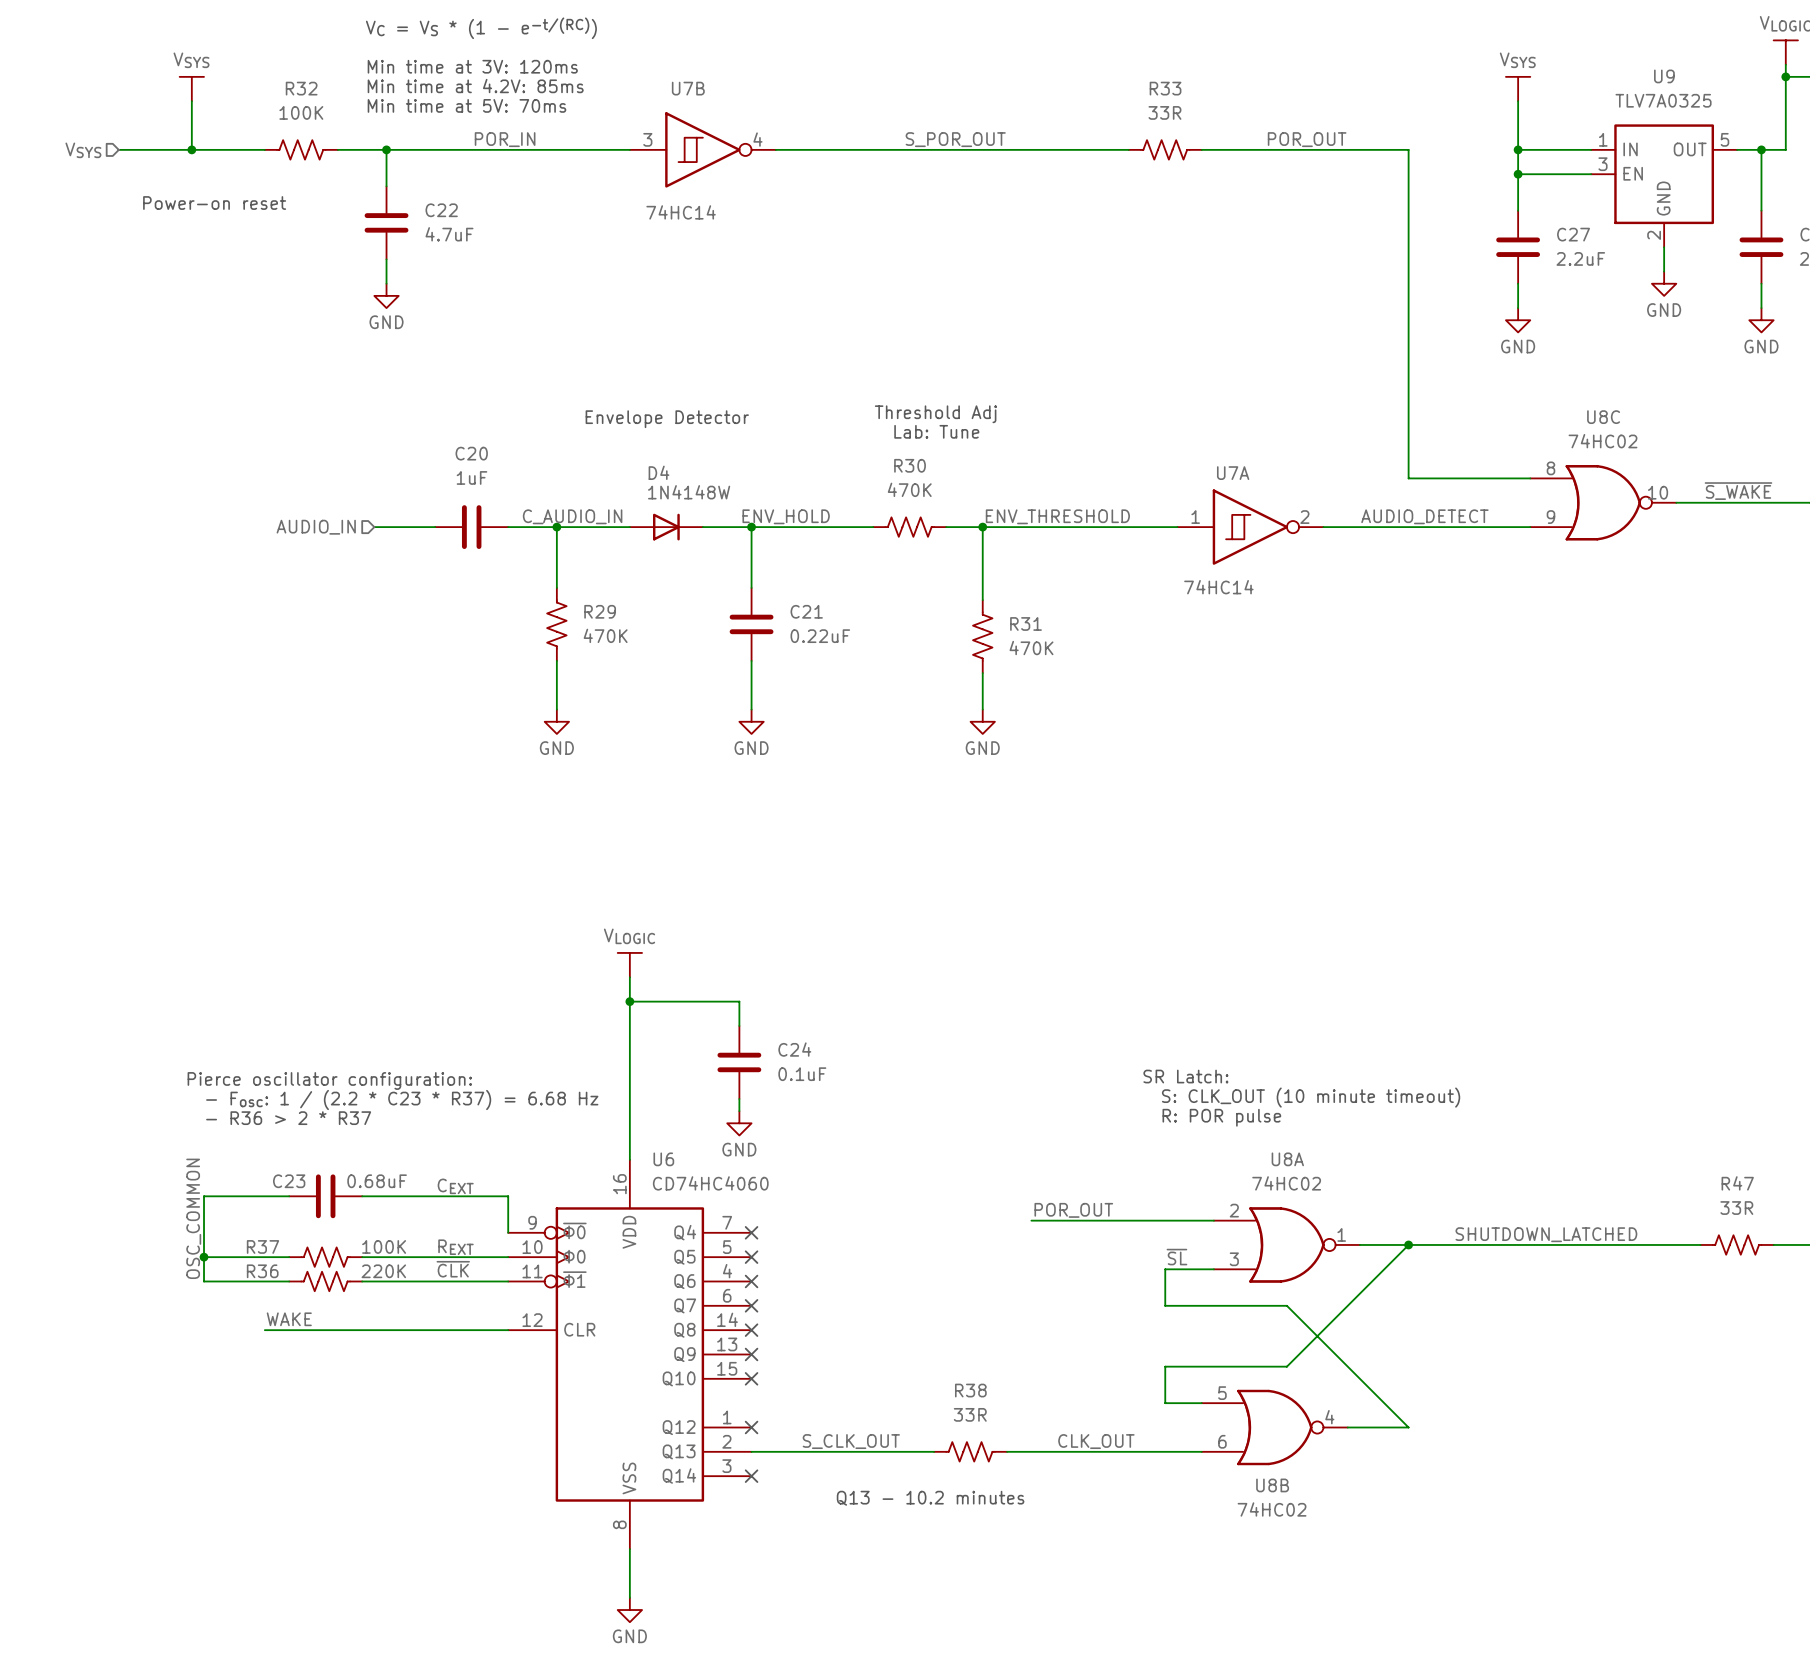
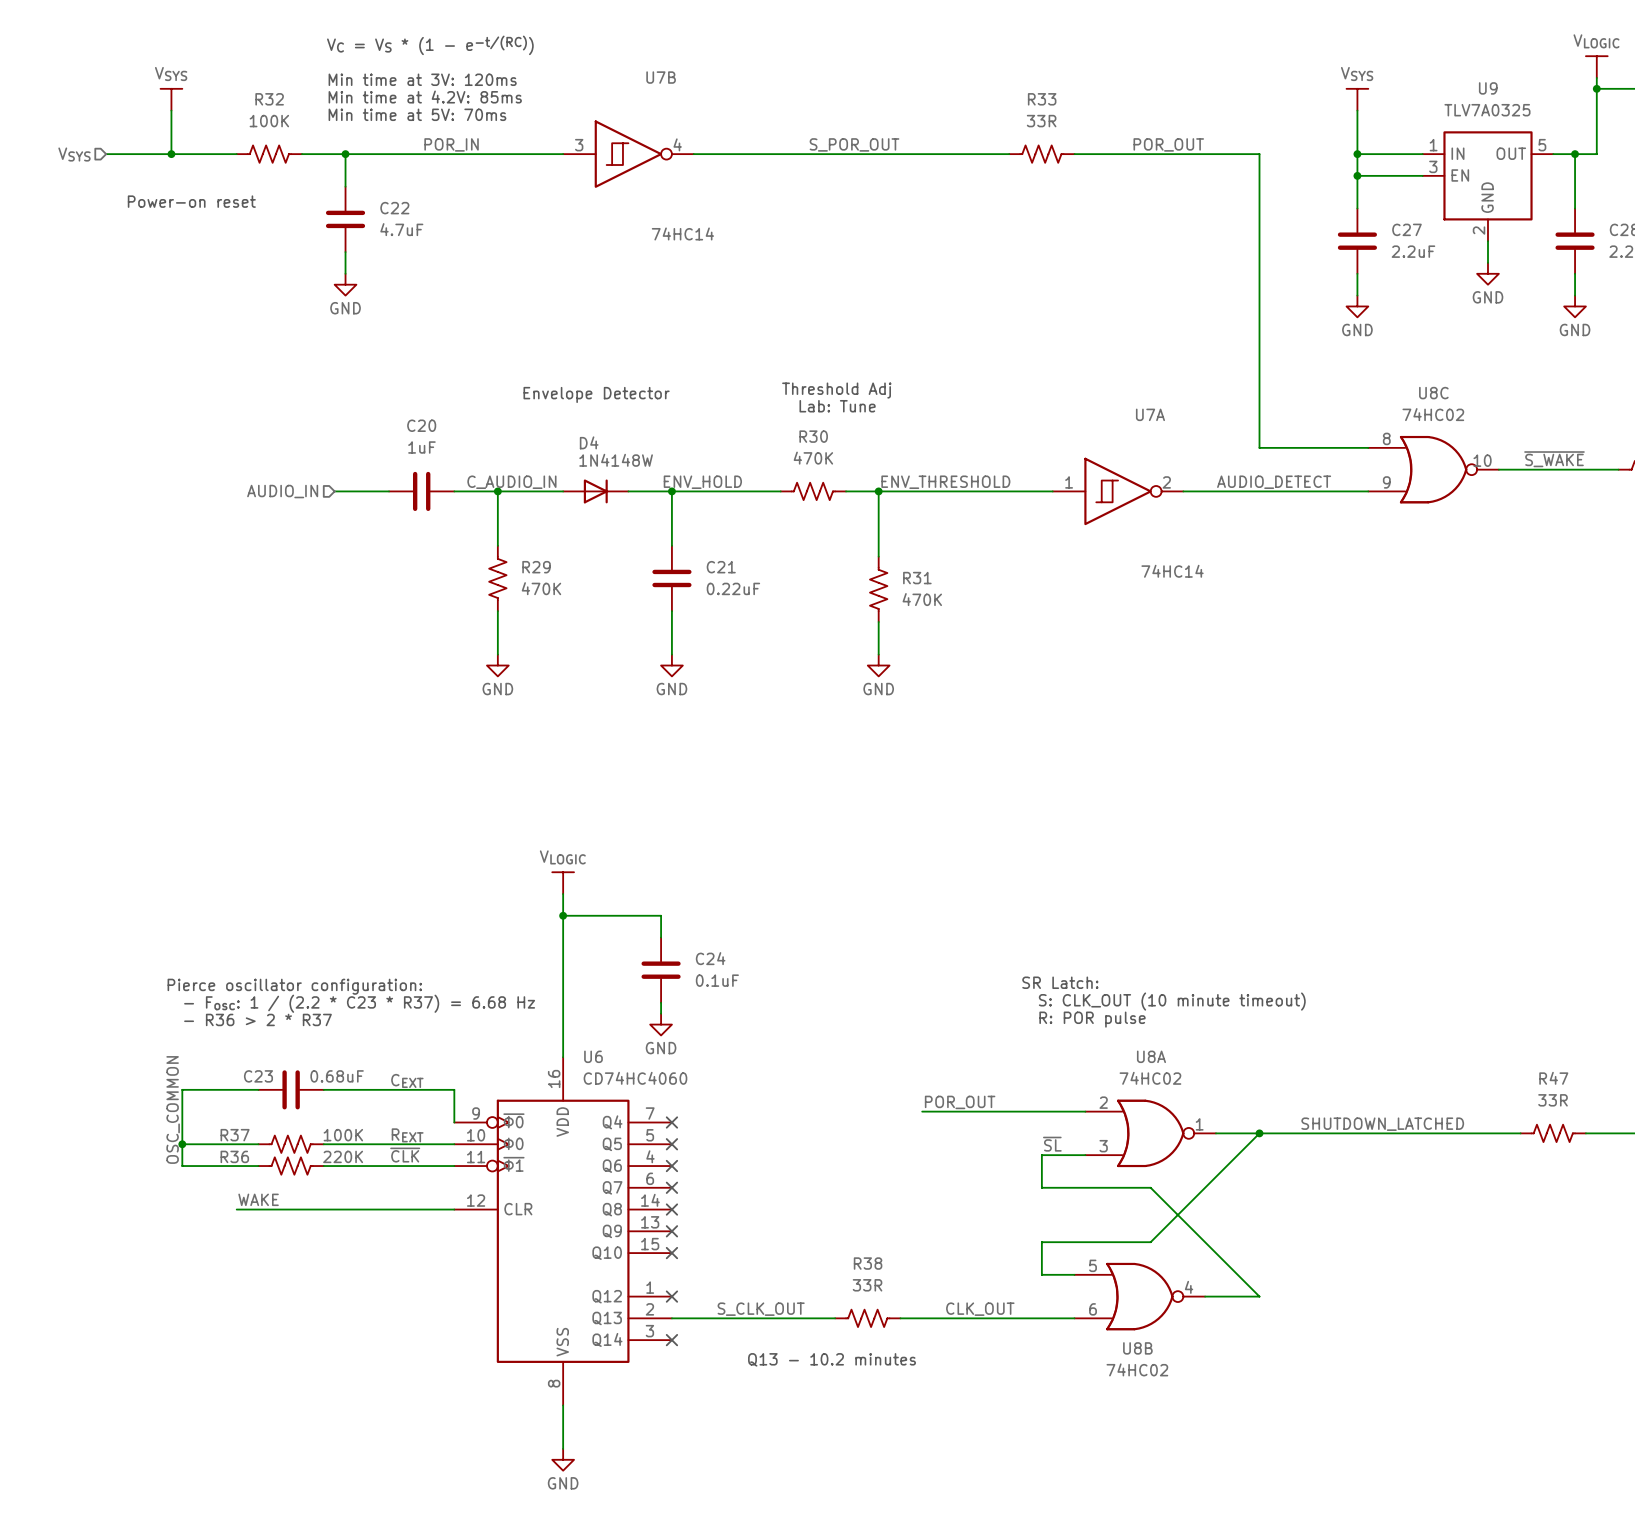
U7B name position: U7B (688, 88) -> U7B (661, 77)
U7B value position: 74HC14 (681, 212) -> 74HC14 (682, 233)
U7A name position: U7A (1233, 473) -> U7A (1150, 414)
U7A value position: 74HC14 (1218, 587) -> 74HC14 (1172, 571)

